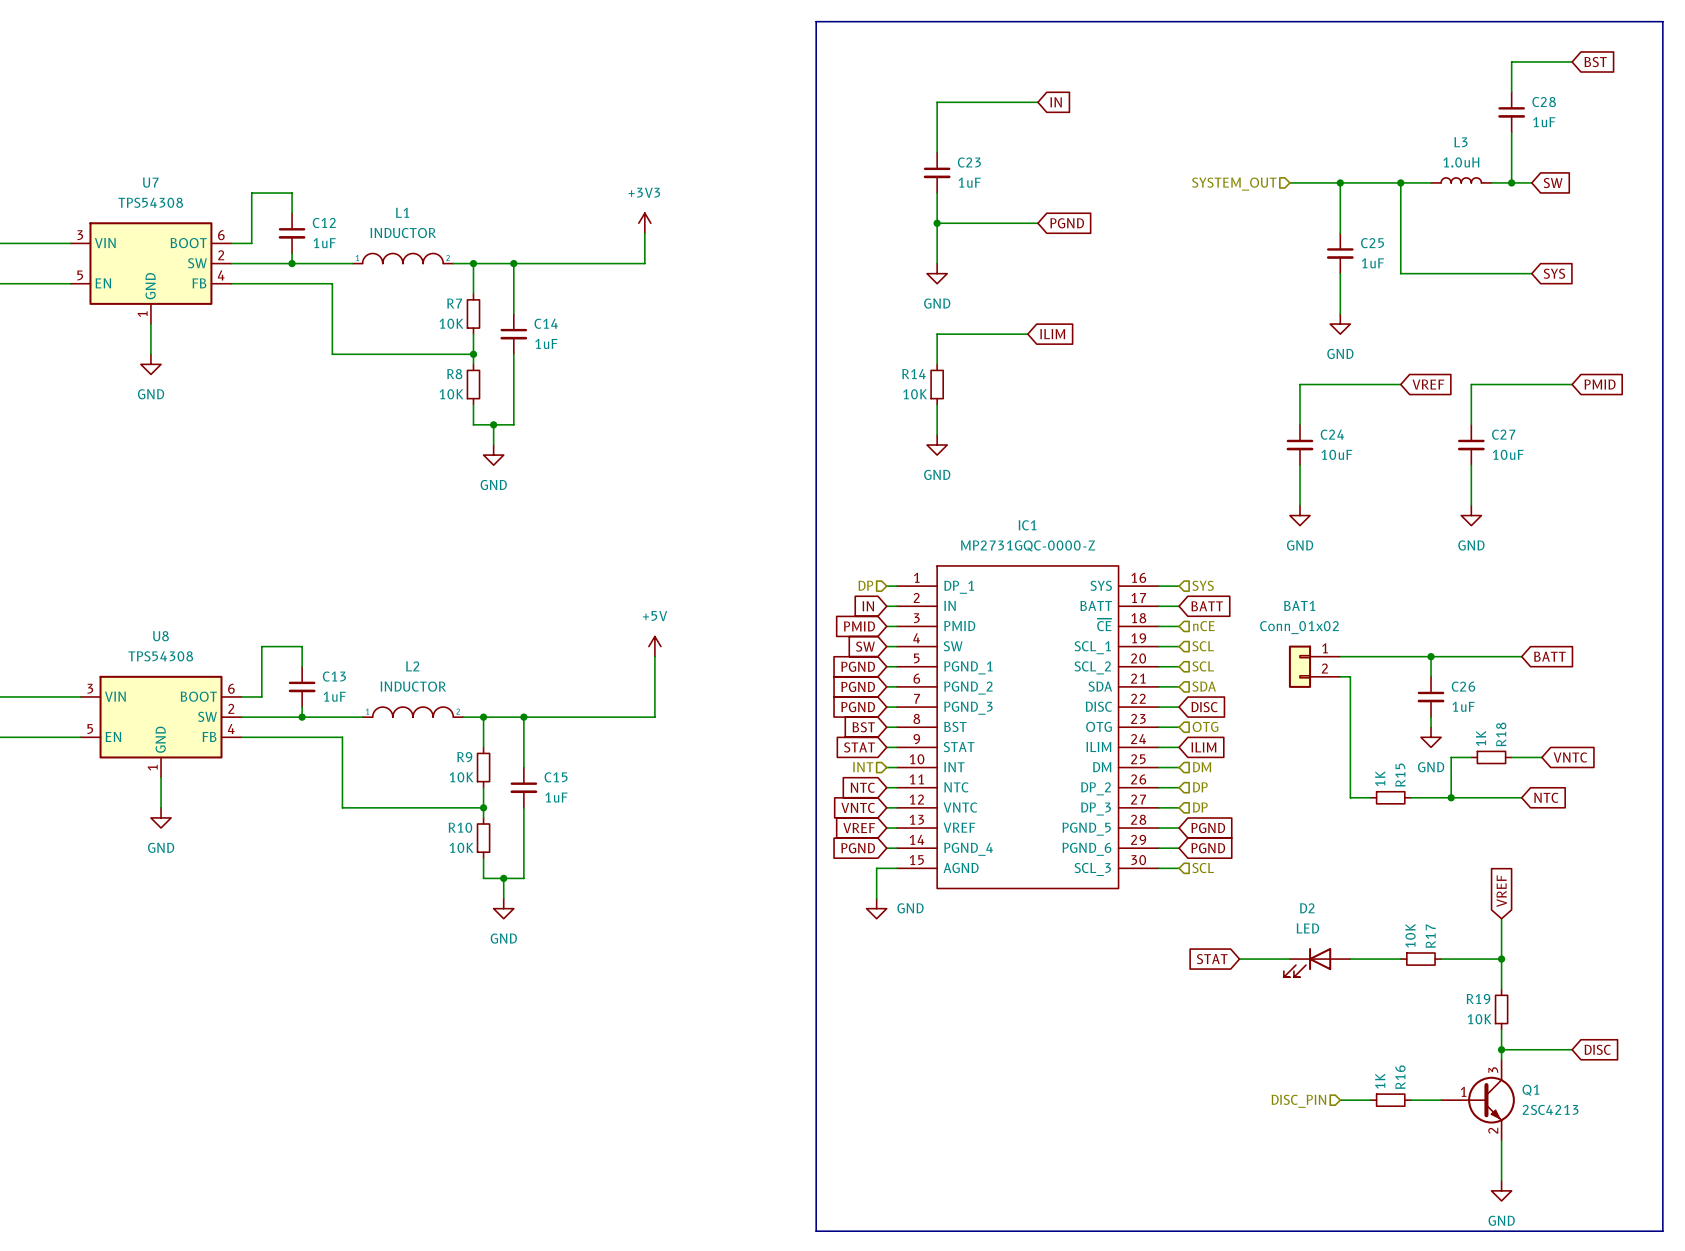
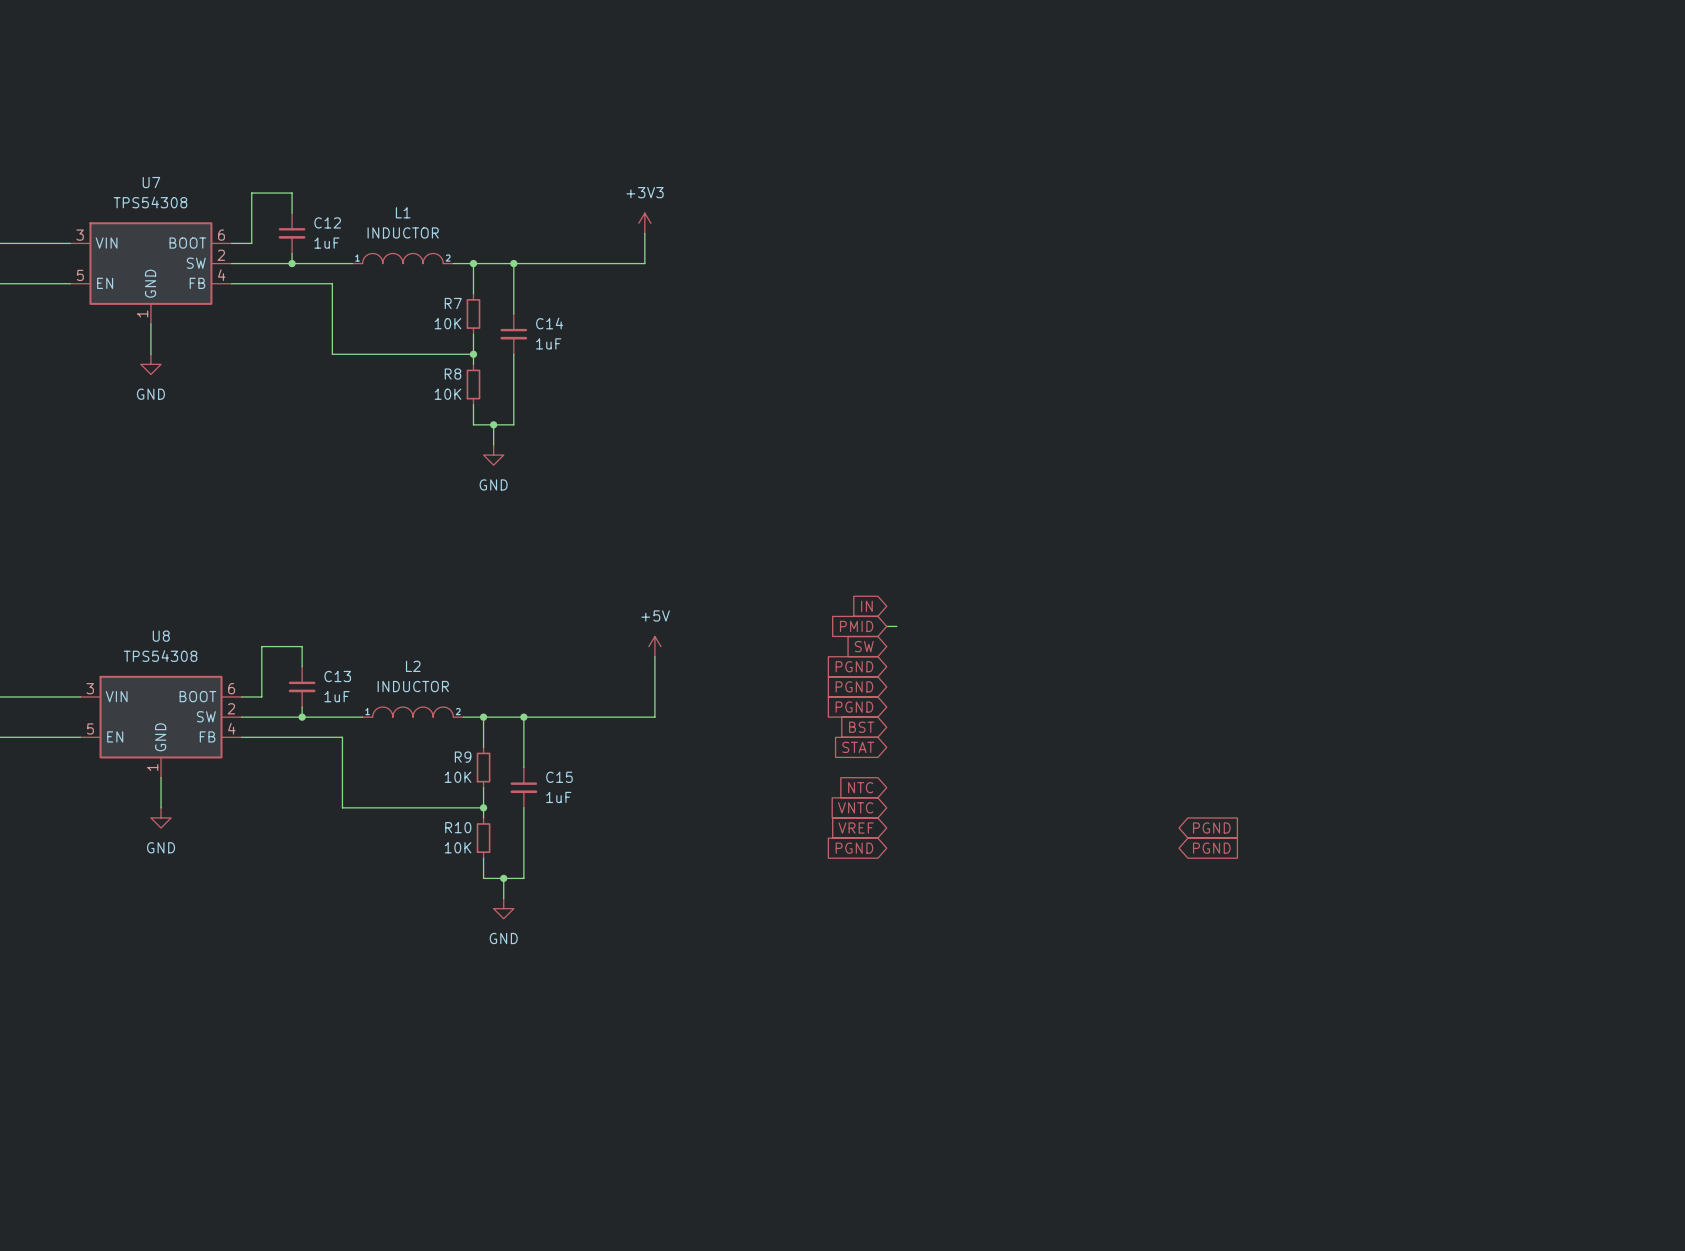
line: (816, 21) (816, 1231) (1662, 1231) (1662, 21) (816, 21) -> none
wire: (1572, 61) (1511, 61) (1511, 92) -> none
global label: BST (1595, 62) -> none
wire: (1037, 102) (937, 102) (937, 152) -> none
global label: IN (1056, 102) -> none
C28: 1uF (1511, 112) -> none
wire: (1511, 132) (1511, 182) -> none
C23: 1uF (937, 172) -> none
L3: 1.0uH (1461, 180) -> none
wire: (1289, 182) (1431, 182) -> none
wire: (1340, 182) (1340, 233) -> none
junction: (1340, 182) -> none
wire: (1400, 182) (1400, 273) (1531, 273) -> none
junction: (1400, 182) -> none
wire: (1491, 182) (1531, 182) -> none
junction: (1511, 182) -> none
global label: SW (1553, 182) -> none
hierarchical label: SYSTEM_OUT (1234, 184) -> none
wire: (937, 193) (937, 263) -> none
wire: (937, 223) (1037, 223) -> none
junction: (937, 223) -> none
global label: PGND (1067, 223) -> none
C25: 1uF (1340, 253) -> none
power symbol: GND (937, 273) -> none
wire: (1340, 273) (1340, 313) -> none
global label: SYS (1554, 273) -> none
power symbol: GND (1340, 324) -> none
wire: (1027, 334) (937, 334) (937, 364) -> none
global label: ILIM (1052, 334) -> none
R14: 10K (937, 384) -> none
wire: (1400, 384) (1299, 384) (1299, 424) -> none
global label: VREF (1428, 384) -> none
wire: (1572, 384) (1471, 384) (1471, 424) -> none
global label: PMID (1600, 384) -> none
wire: (937, 404) (937, 434) -> none
power symbol: GND (937, 445) -> none
C24: 10uF (1299, 445) -> none
C27: 10uF (1471, 445) -> none
wire: (1299, 465) (1299, 505) -> none
wire: (1471, 465) (1471, 505) -> none
power symbol: GND (1299, 515) -> none
power symbol: GND (1471, 515) -> none
hierarchical label: DP (865, 585) -> none
hierarchical label: SYS (1203, 585) -> none
wire: (886, 586) (896, 586) -> none
wire: (1158, 586) (1179, 586) -> none
wire: (886, 606) (896, 606) -> none
wire: (1158, 606) (1179, 606) -> none
global label: BATT (1207, 606) -> none
wire: (1158, 626) (1179, 626) -> none
hierarchical label: nCE (1203, 626) -> none
wire: (886, 646) (896, 646) -> none
wire: (1158, 646) (1179, 646) -> none
hierarchical label: SCL (1203, 646) -> none
wire: (1340, 656) (1521, 656) -> none
wire: (1431, 656) (1431, 676) -> none
junction: (1431, 656) -> none
global label: BATT (1549, 656) -> none
wire: (886, 666) (896, 666) -> none
wire: (1158, 666) (1179, 666) -> none
hierarchical label: SCL (1203, 666) -> none
BAT1: Conn_01x02 (1314, 666) -> none
wire: (1340, 676) (1350, 676) (1350, 797) (1370, 797) -> none
wire: (886, 686) (896, 686) -> none
wire: (1158, 686) (1179, 686) -> none
hierarchical label: SDA (1204, 686) -> none
C26: 1uF (1431, 696) -> none
wire: (886, 707) (896, 707) -> none
wire: (1158, 707) (1179, 707) -> none
global label: DISC (1204, 707) -> none
wire: (1431, 717) (1431, 727) -> none
hierarchical label: OTG (1205, 726) -> none
wire: (886, 727) (896, 727) -> none
IC1: MP2731GQC-0000-Z (1027, 727) -> none
wire: (1158, 727) (1179, 727) -> none
power symbol: GND (1431, 737) -> none
wire: (886, 747) (896, 747) -> none
wire: (1158, 747) (1179, 747) -> none
global label: ILIM (1203, 747) -> none
wire: (1471, 757) (1451, 757) (1451, 797) -> none
R18: 1K (1491, 757) -> none
wire: (1511, 757) (1541, 757) -> none
global label: VNTC (1570, 757) -> none
hierarchical label: INT (863, 767) -> none
wire: (886, 767) (896, 767) -> none
wire: (1158, 767) (1179, 767) -> none
hierarchical label: DM (1202, 767) -> none
wire: (886, 787) (896, 787) -> none
wire: (1158, 787) (1179, 787) -> none
hierarchical label: DP (1200, 787) -> none
R15: 1K (1390, 797) -> none
wire: (1410, 797) (1521, 797) -> none
junction: (1451, 797) -> none
global label: NTC (1546, 797) -> none
wire: (886, 807) (896, 807) -> none
wire: (1158, 807) (1179, 807) -> none
hierarchical label: DP (1200, 807) -> none
wire: (886, 828) (896, 828) -> none
wire: (1158, 828) (1179, 828) -> none
wire: (886, 848) (896, 848) -> none
wire: (1158, 848) (1179, 848) -> none
wire: (896, 868) (876, 868) (876, 898) -> none
wire: (1158, 868) (1179, 868) -> none
hierarchical label: SCL (1203, 868) -> none
global label: VREF (1501, 891) -> none
power symbol: GND (876, 908) -> none
wire: (1501, 918) (1501, 989) -> none
global label: STAT (1212, 959) -> none
wire: (1239, 959) (1289, 959) -> none
wire: (1350, 959) (1400, 959) -> none
R17: 10K (1420, 959) -> none
wire: (1441, 959) (1501, 959) -> none
junction: (1501, 959) -> none
D2: LED (1317, 962) -> none
R19: 10K (1501, 1009) -> none
wire: (1501, 1029) (1501, 1059) -> none
wire: (1501, 1049) (1572, 1049) -> none
junction: (1501, 1049) -> none
global label: DISC (1597, 1049) -> none
wire: (1340, 1100) (1370, 1100) -> none
R16: 1K (1390, 1100) -> none
wire: (1410, 1100) (1441, 1100) -> none
Q1: 2SC4213 (1477, 1100) -> none
hierarchical label: DISC_PIN (1298, 1101) -> none
wire: (1501, 1140) (1501, 1180) -> none
power symbol: GND (1501, 1190) -> none

